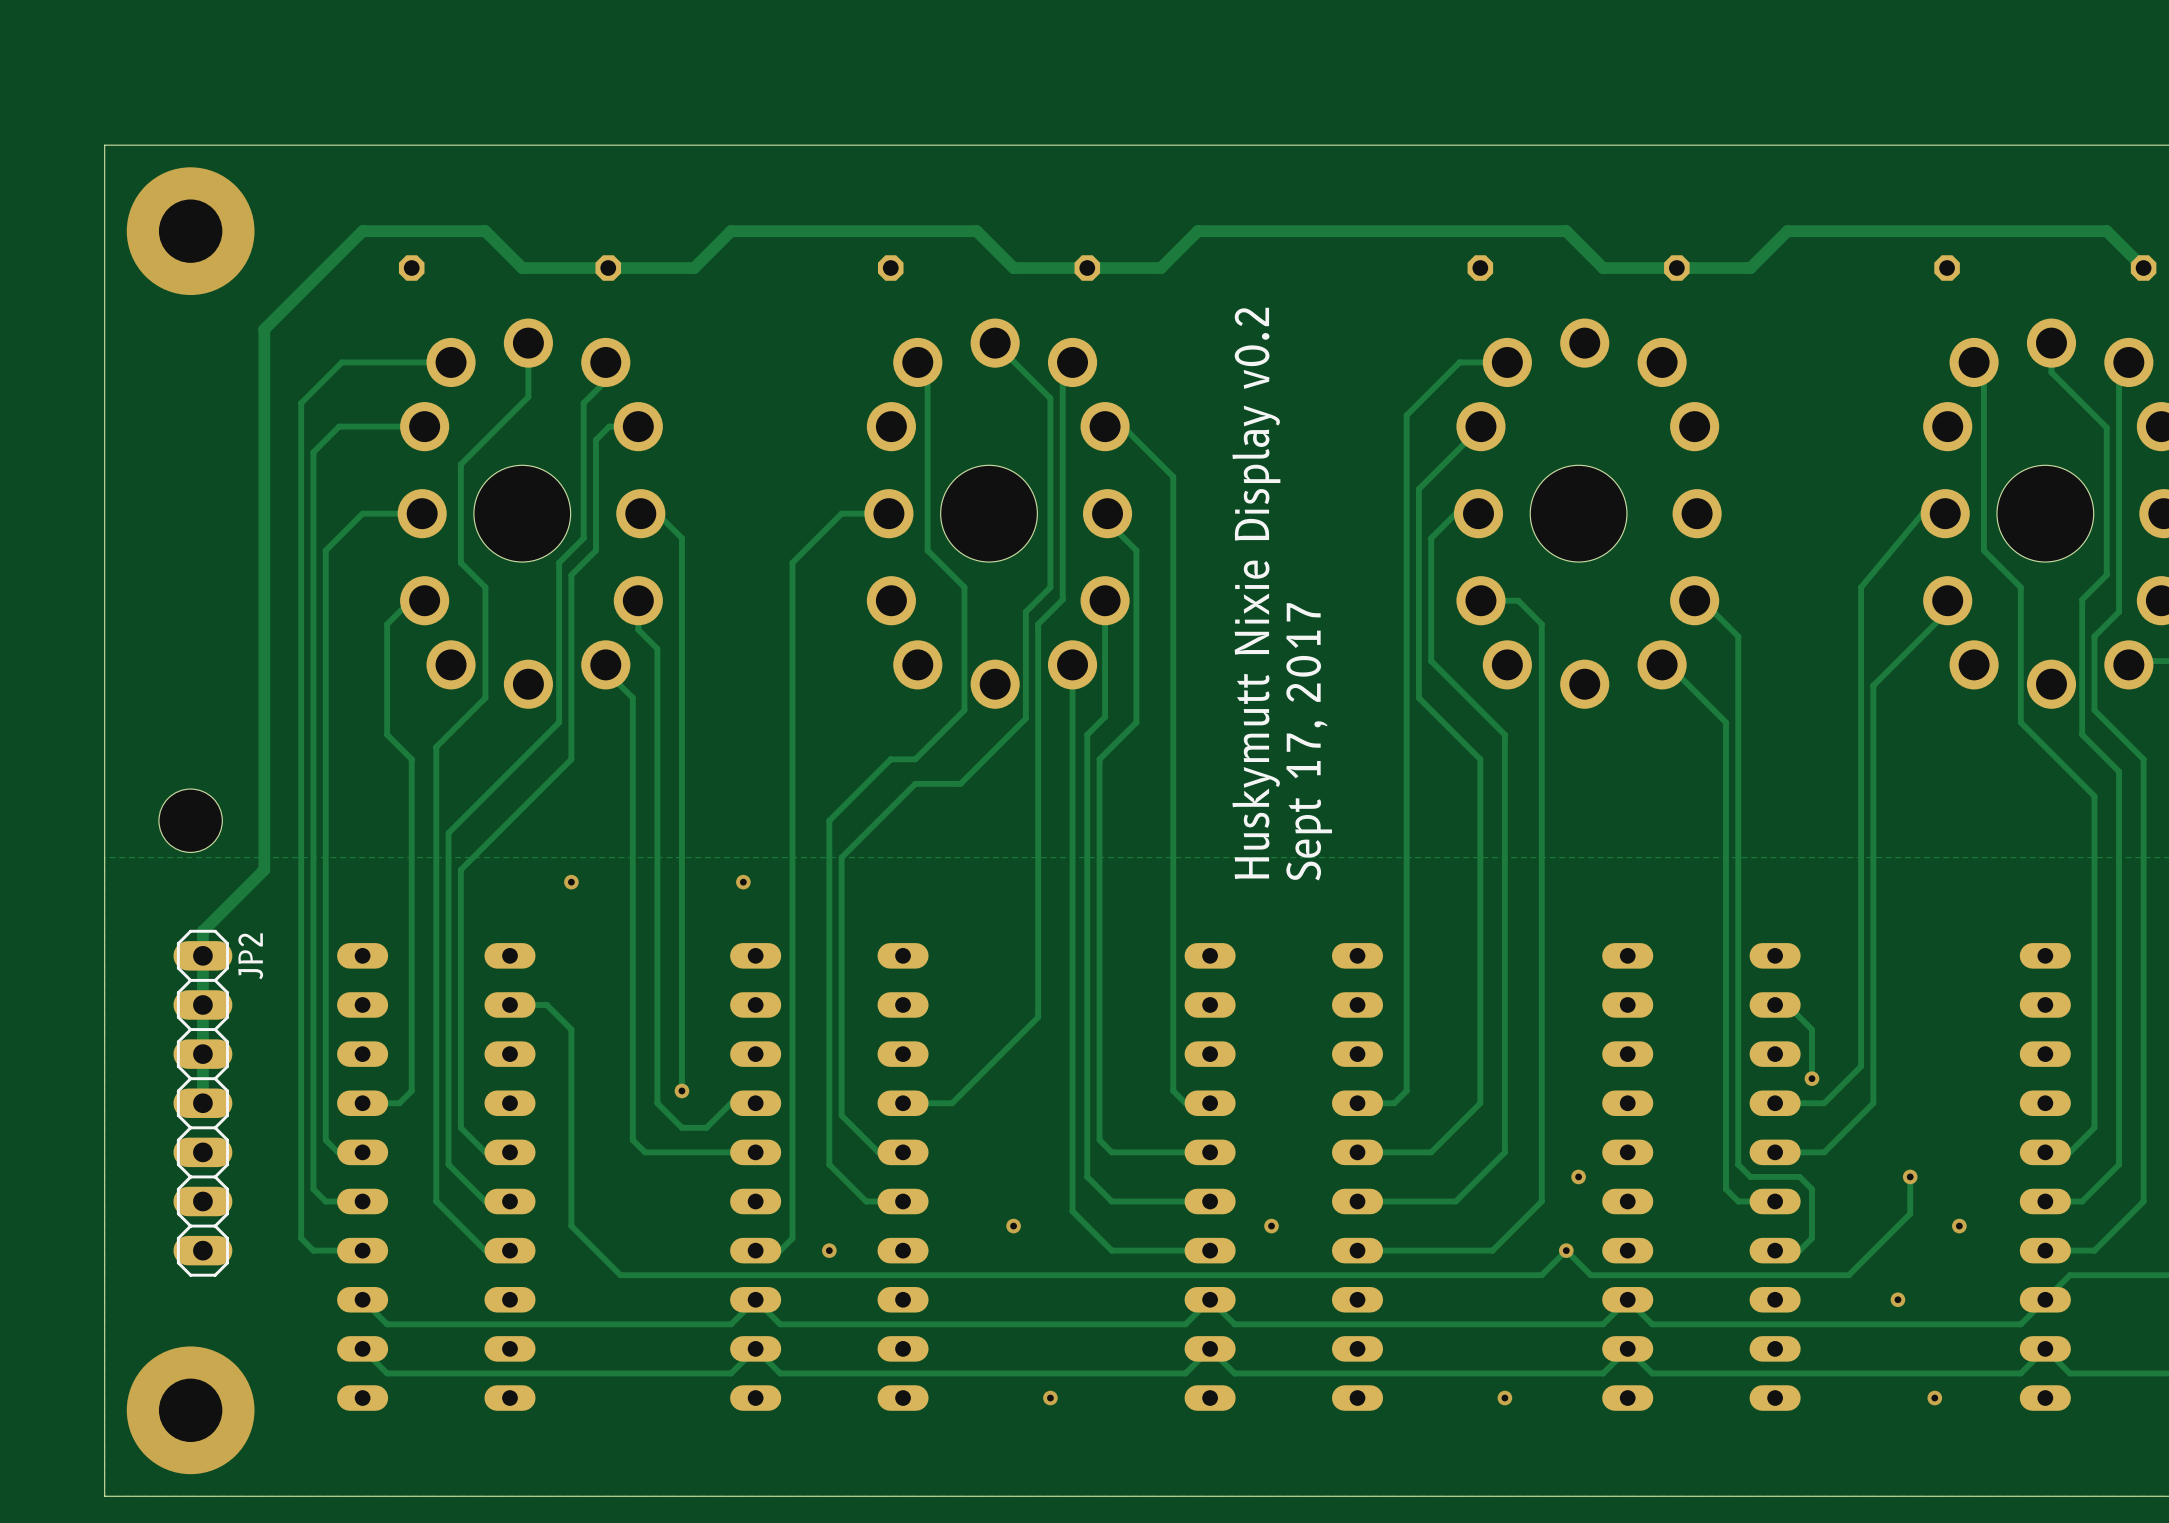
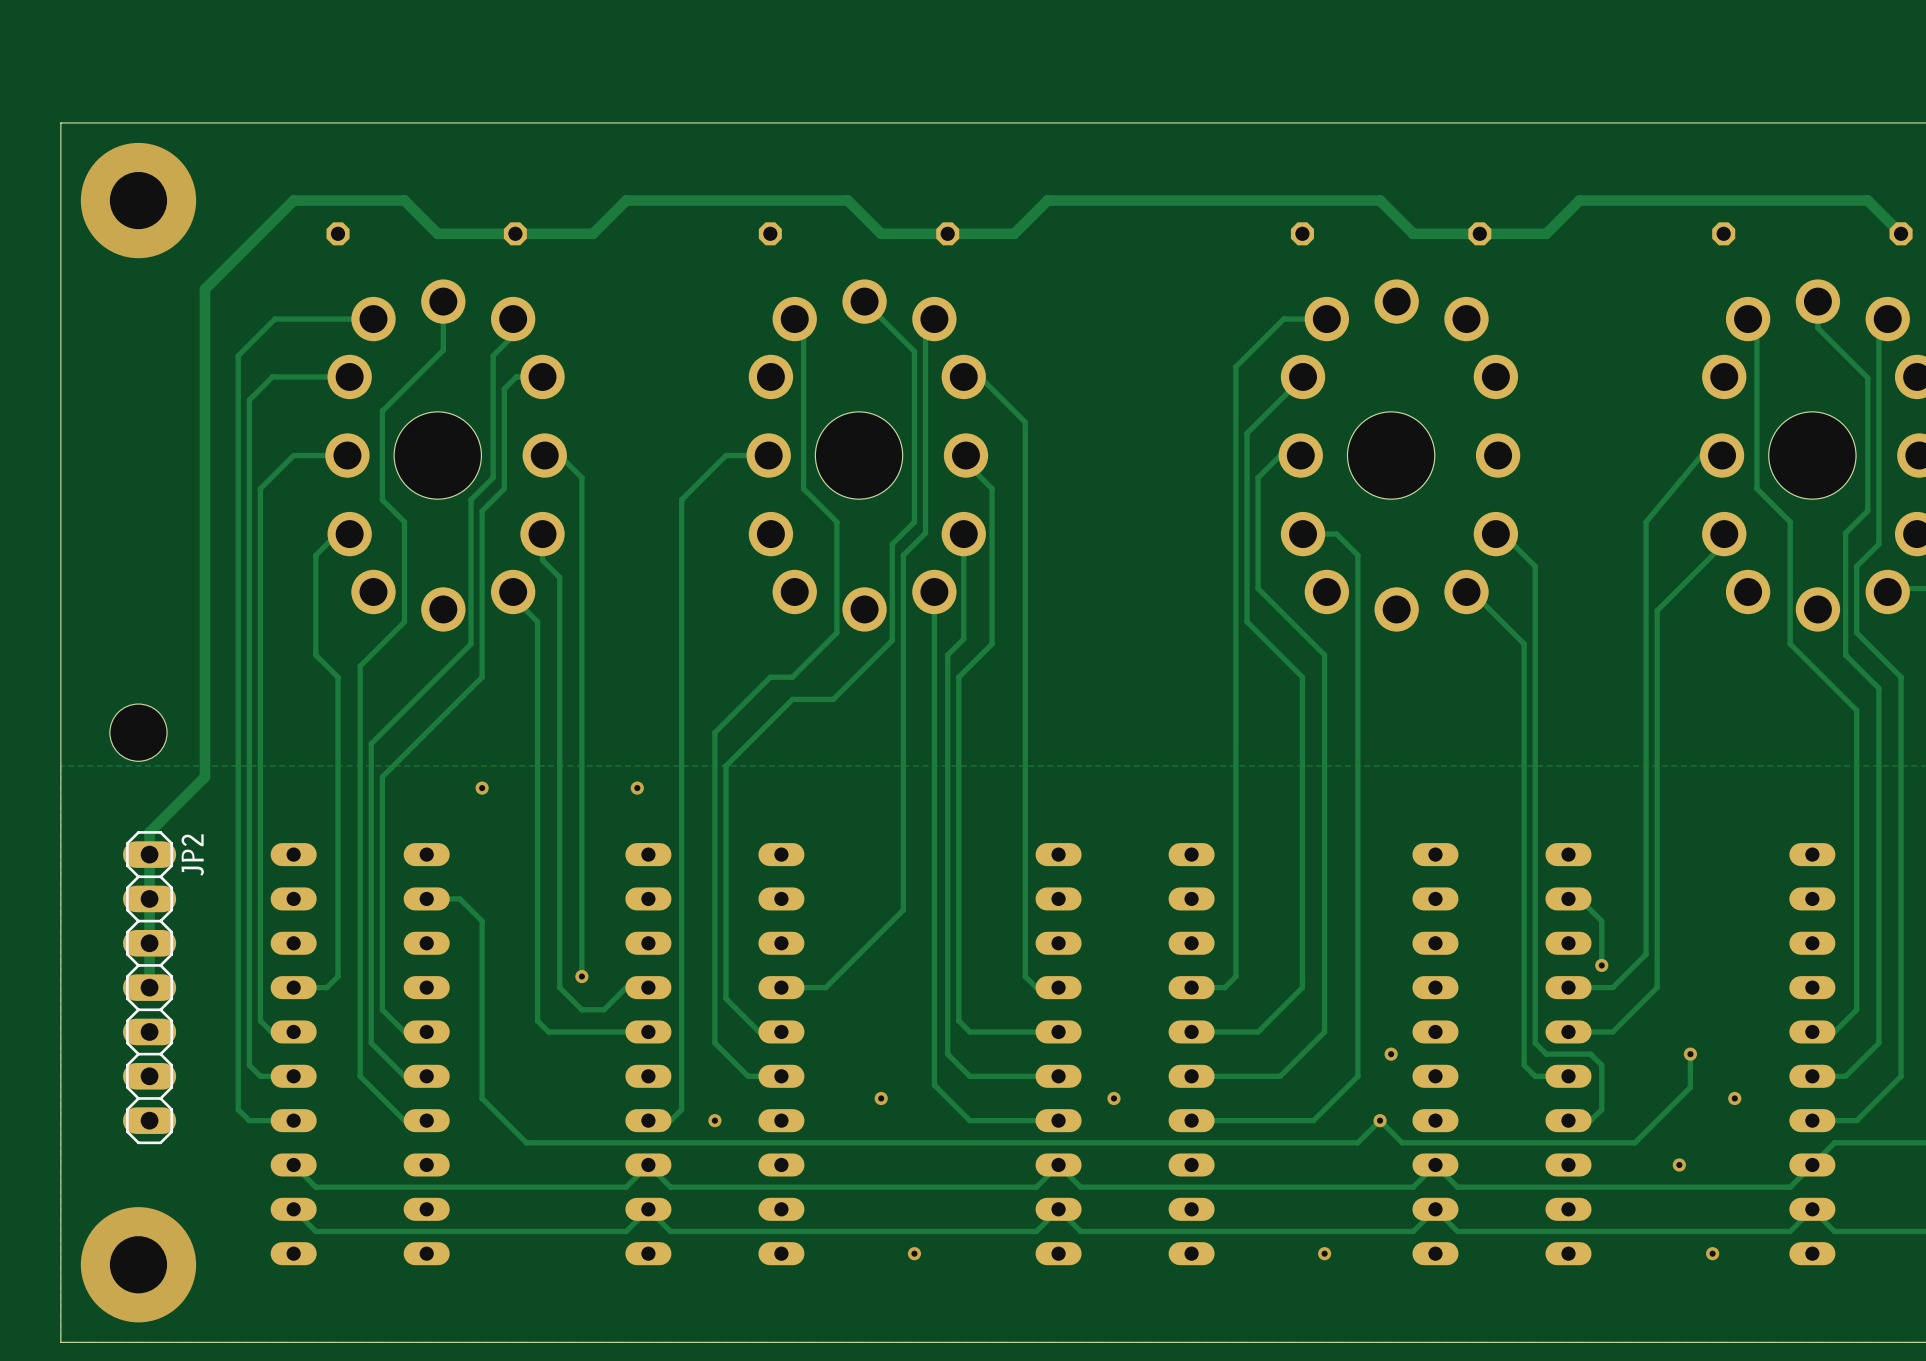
text: Huskymutt Nixie Display v0.2 (1256, 593) -> none
text: Sept 17, 2017 (1309, 741) -> none

